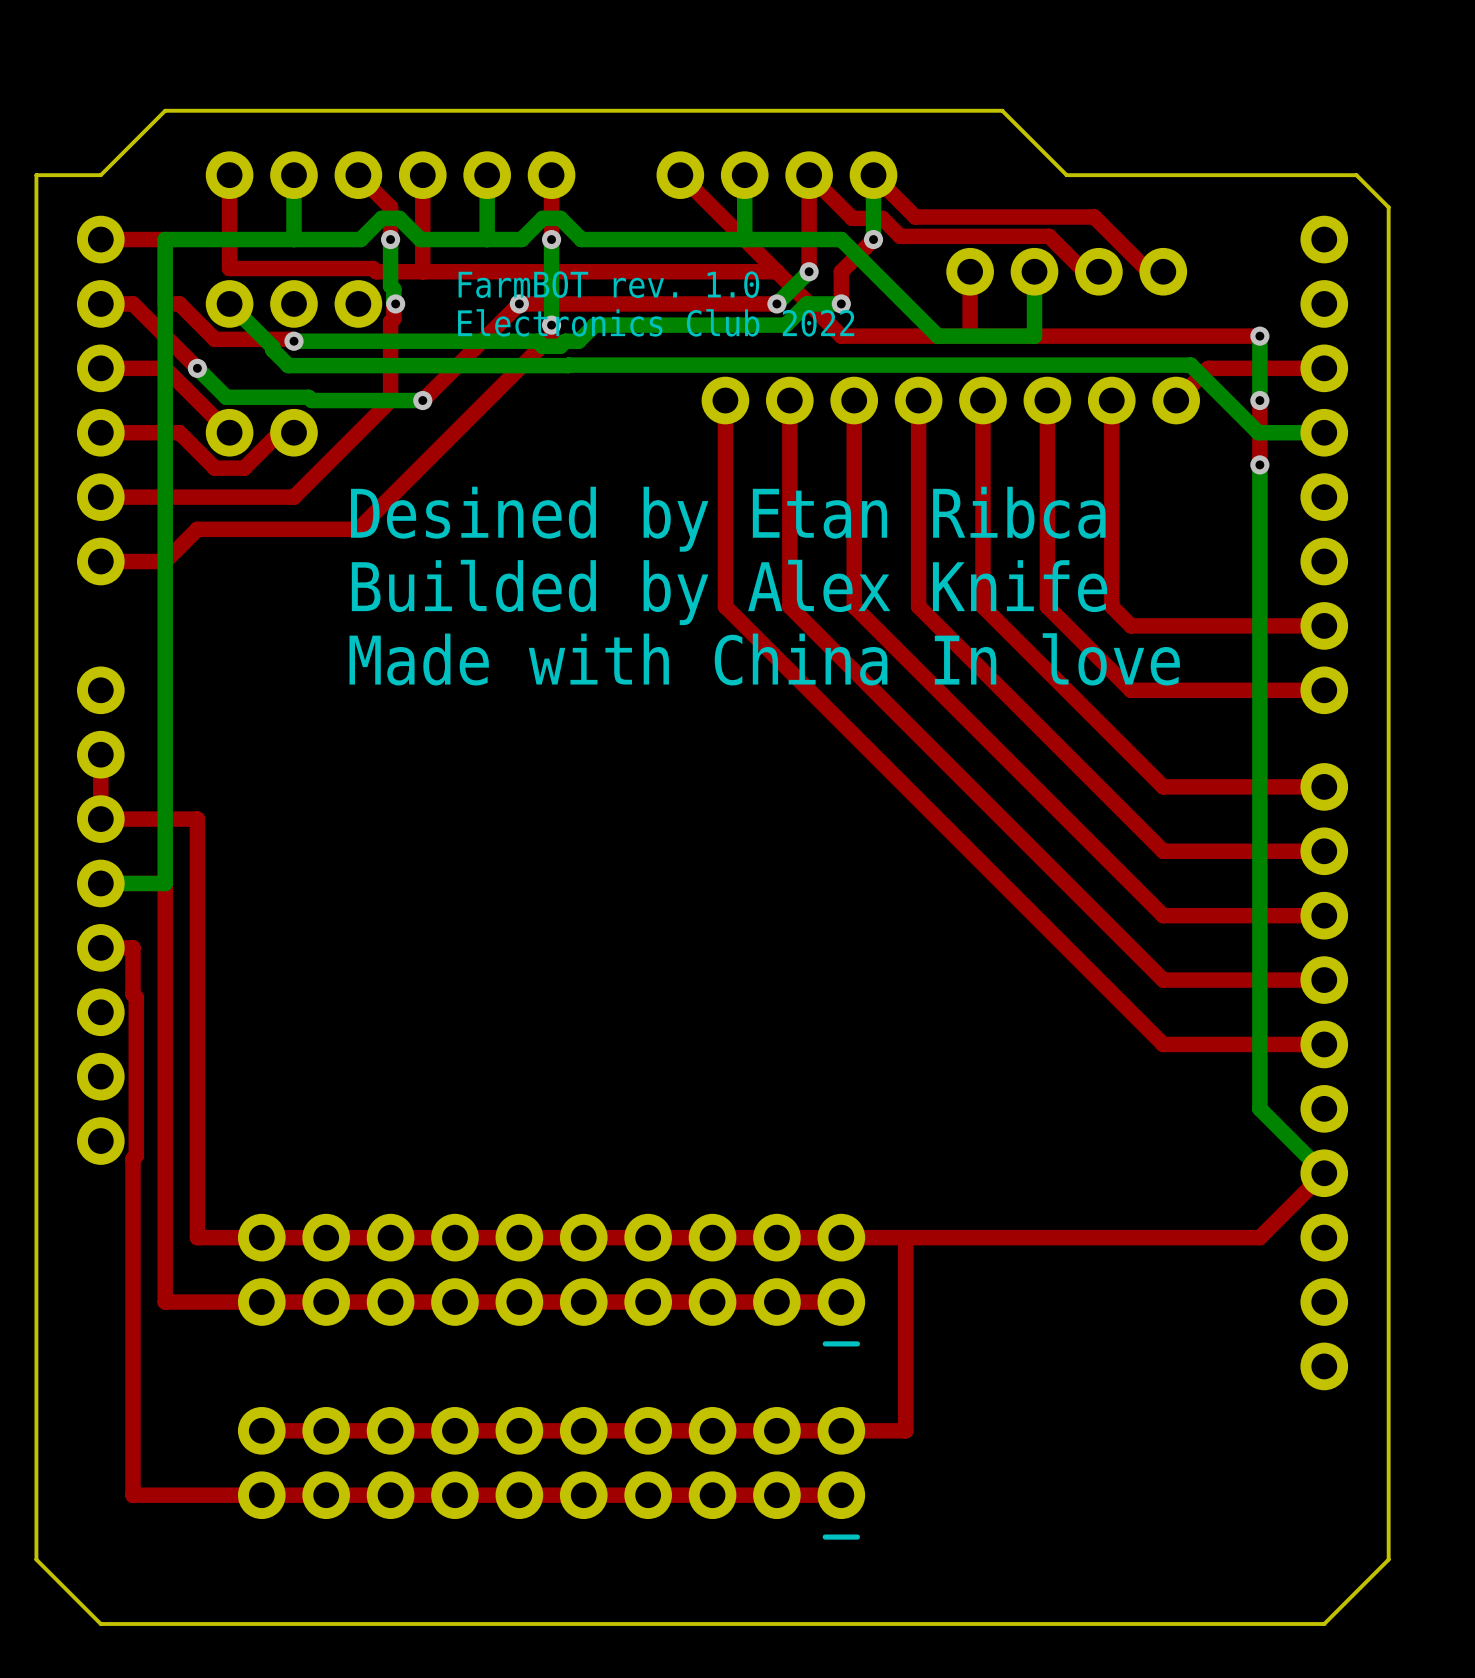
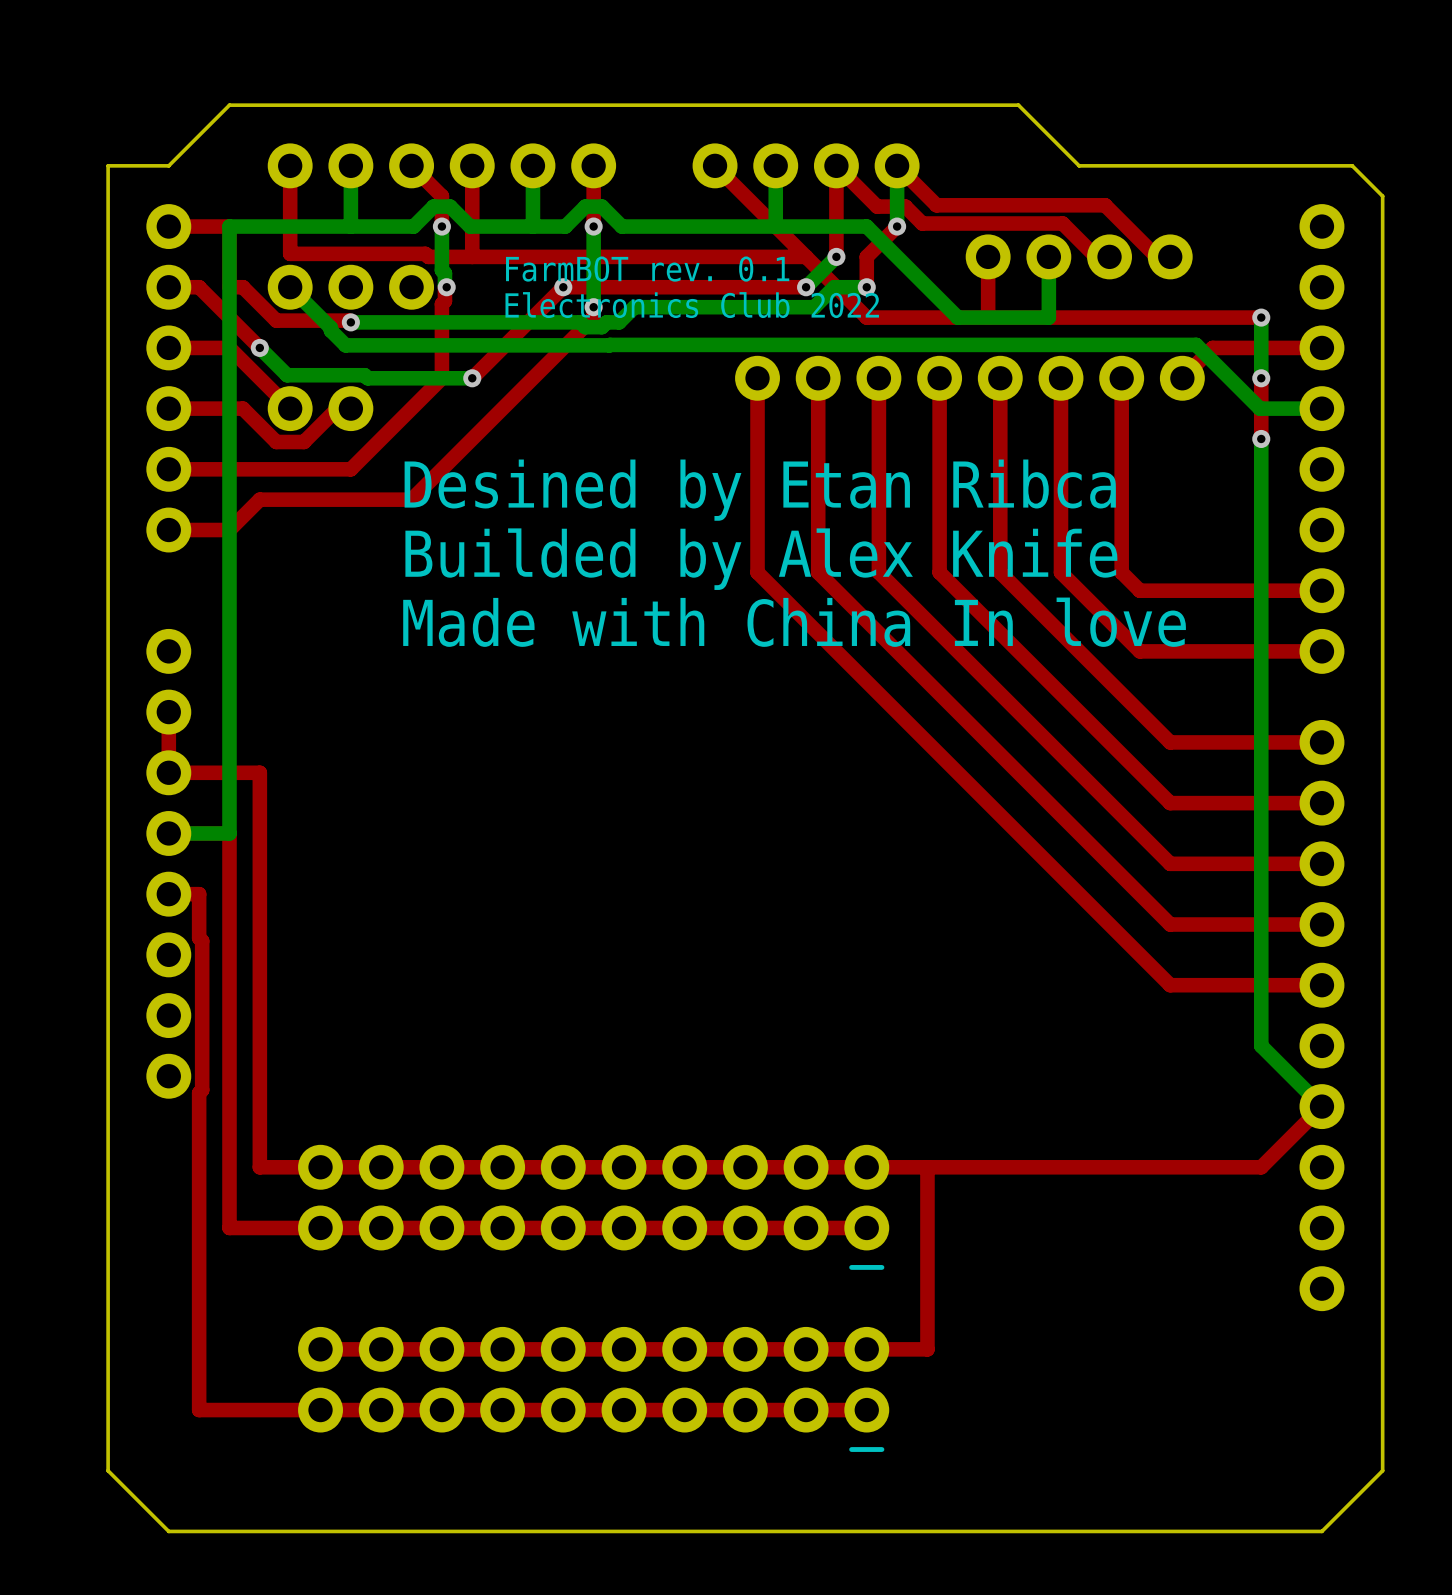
text: FarmBOT rev. 1.0 (608, 284) -> FarmBOT rev. 0.1 (647, 269)

